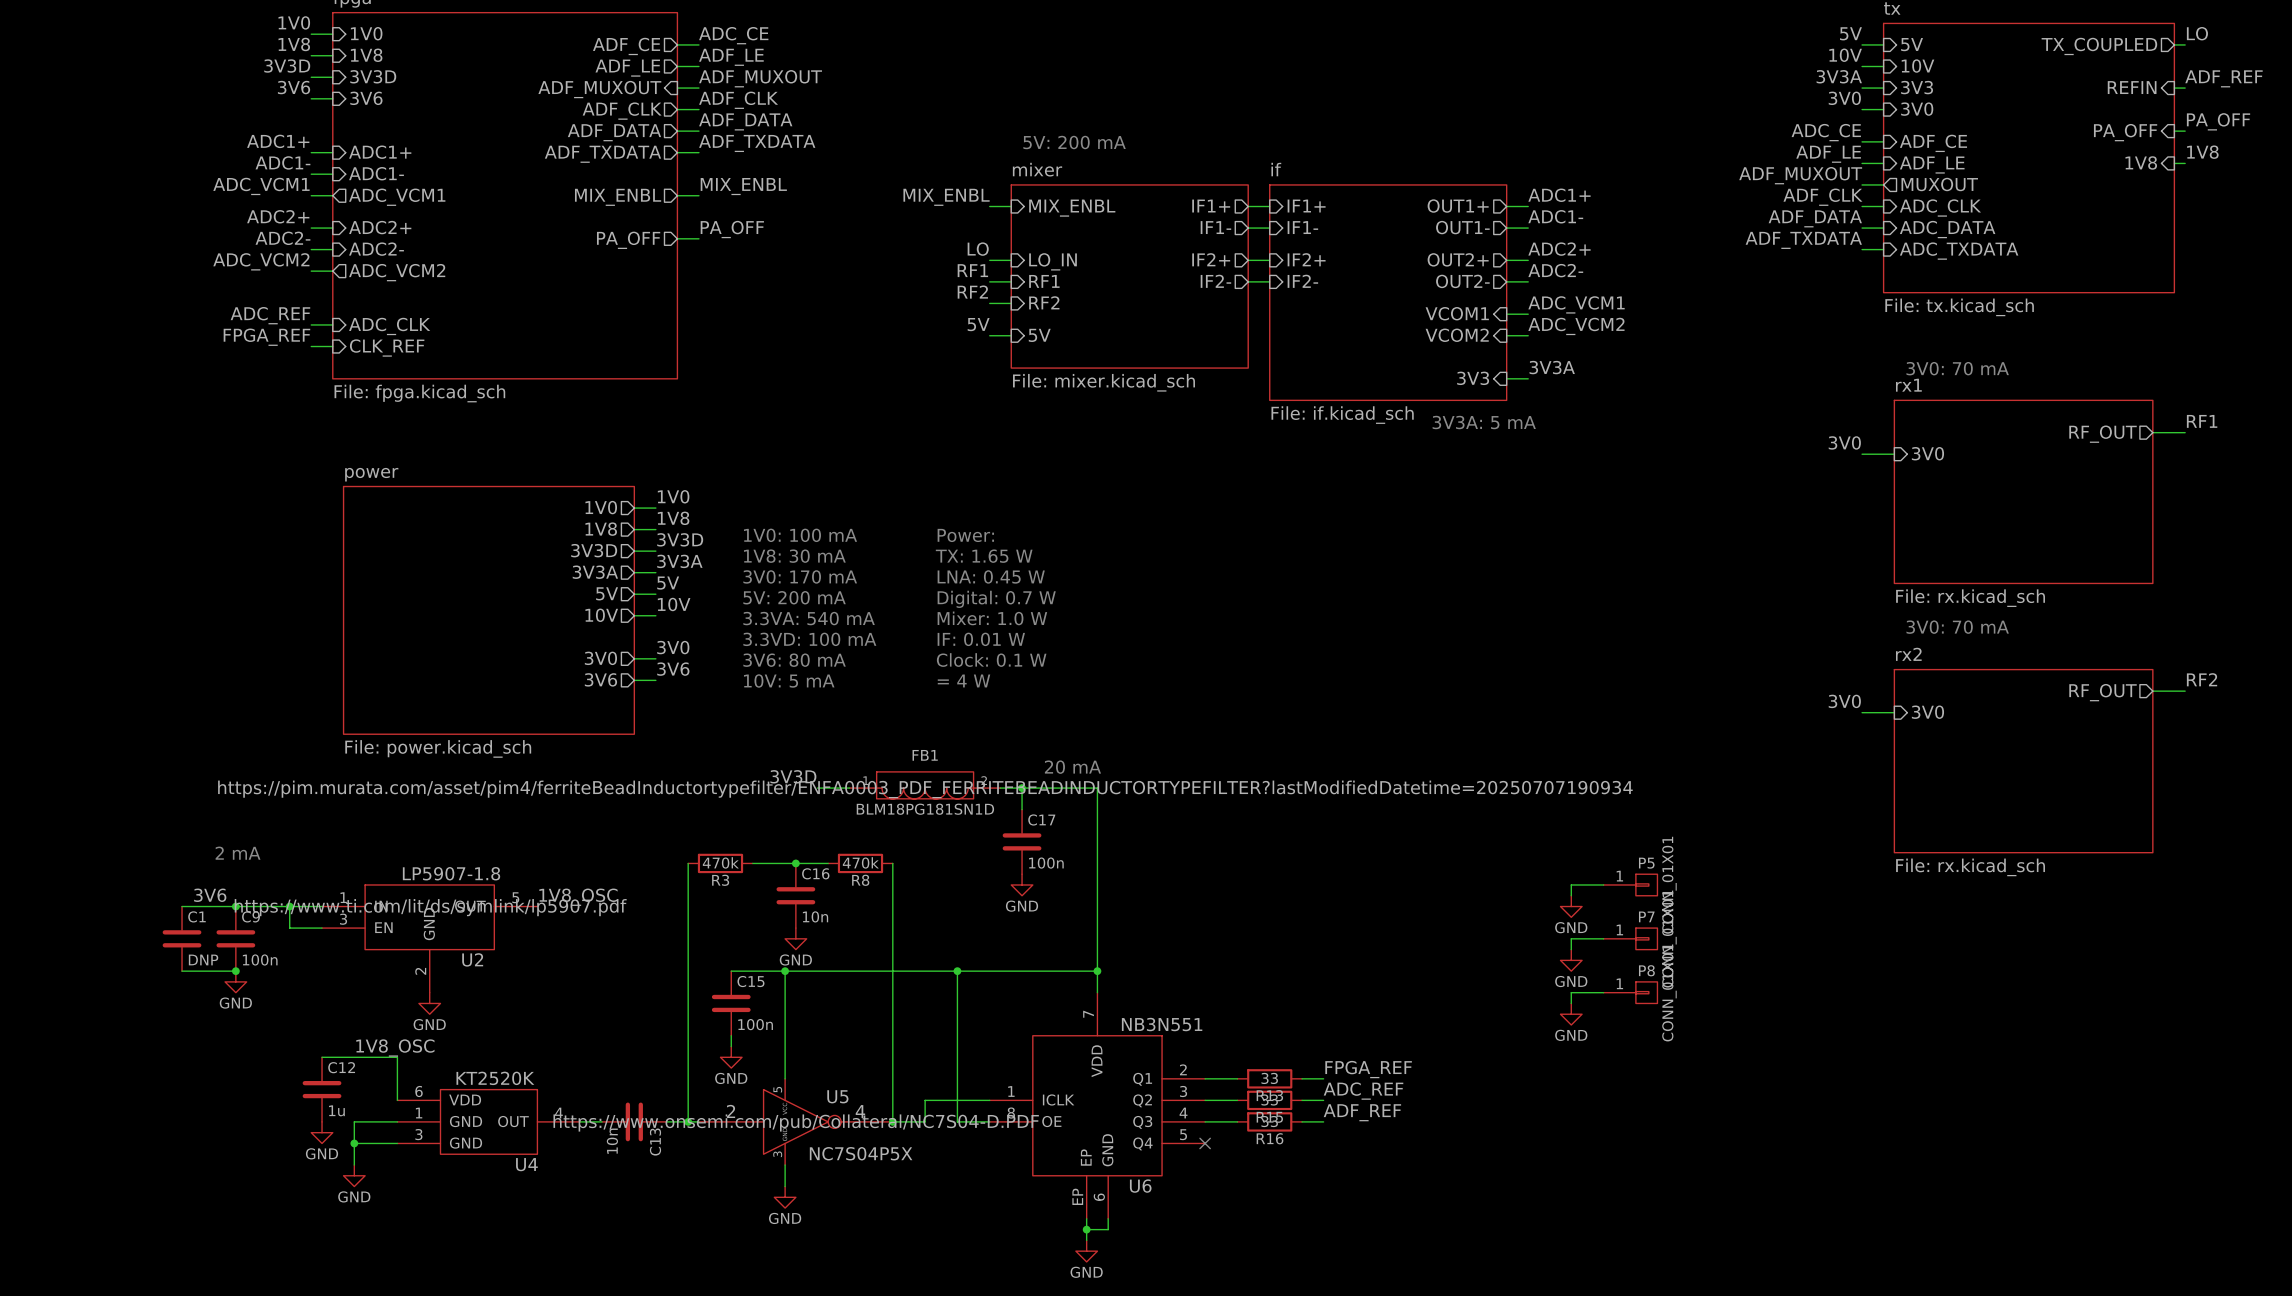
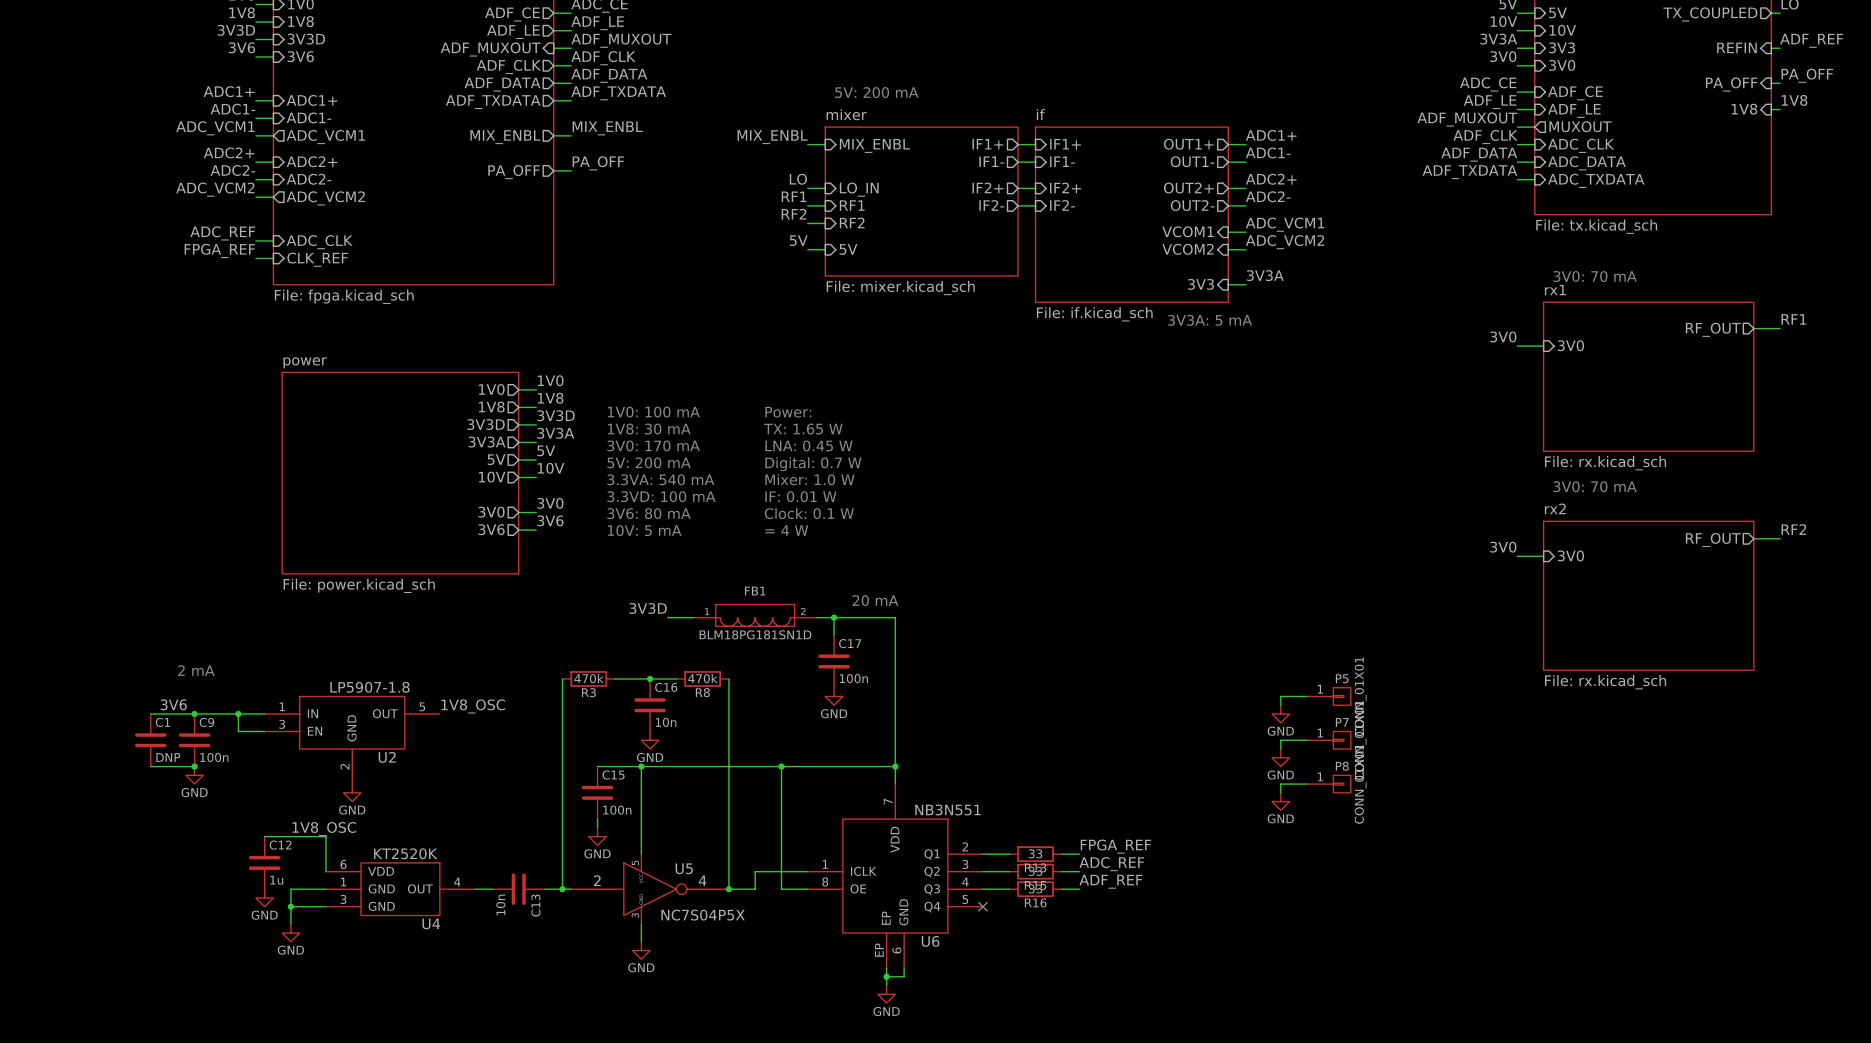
FB1 text: https://pim.murata.com/asset/pim4/ferriteBeadInductortypefilter/ENFA0003_PDF_FERRITEBEADINDUCTORTYPEFILTER?lastModifiedDatetime=20250707190934 (925, 789) -> none
U2 text: https://www.ti.com/lit/ds/symlink/lp5907.pdf (430, 907) -> none
U5 text: https://www.onsemi.com/pub/Collateral/NC7S04-D.PDF (796, 1123) -> none

